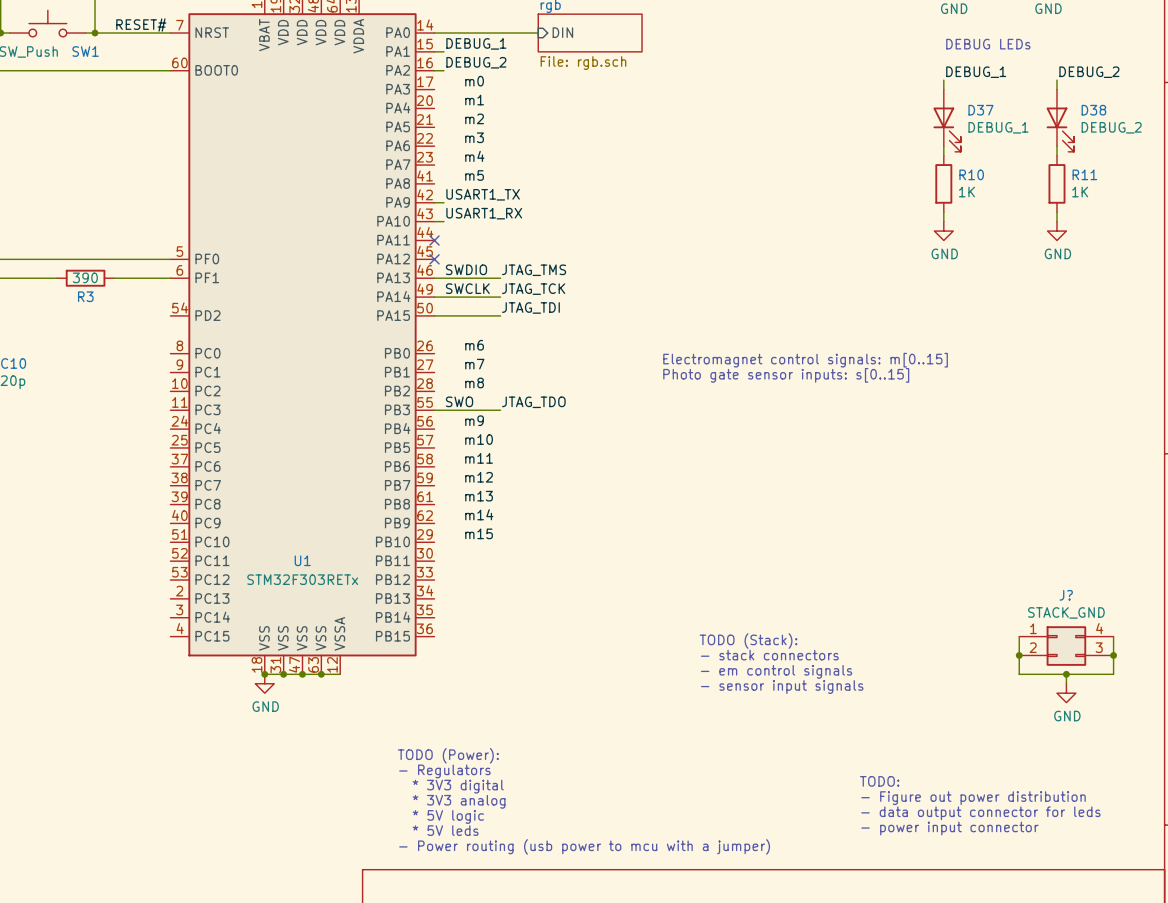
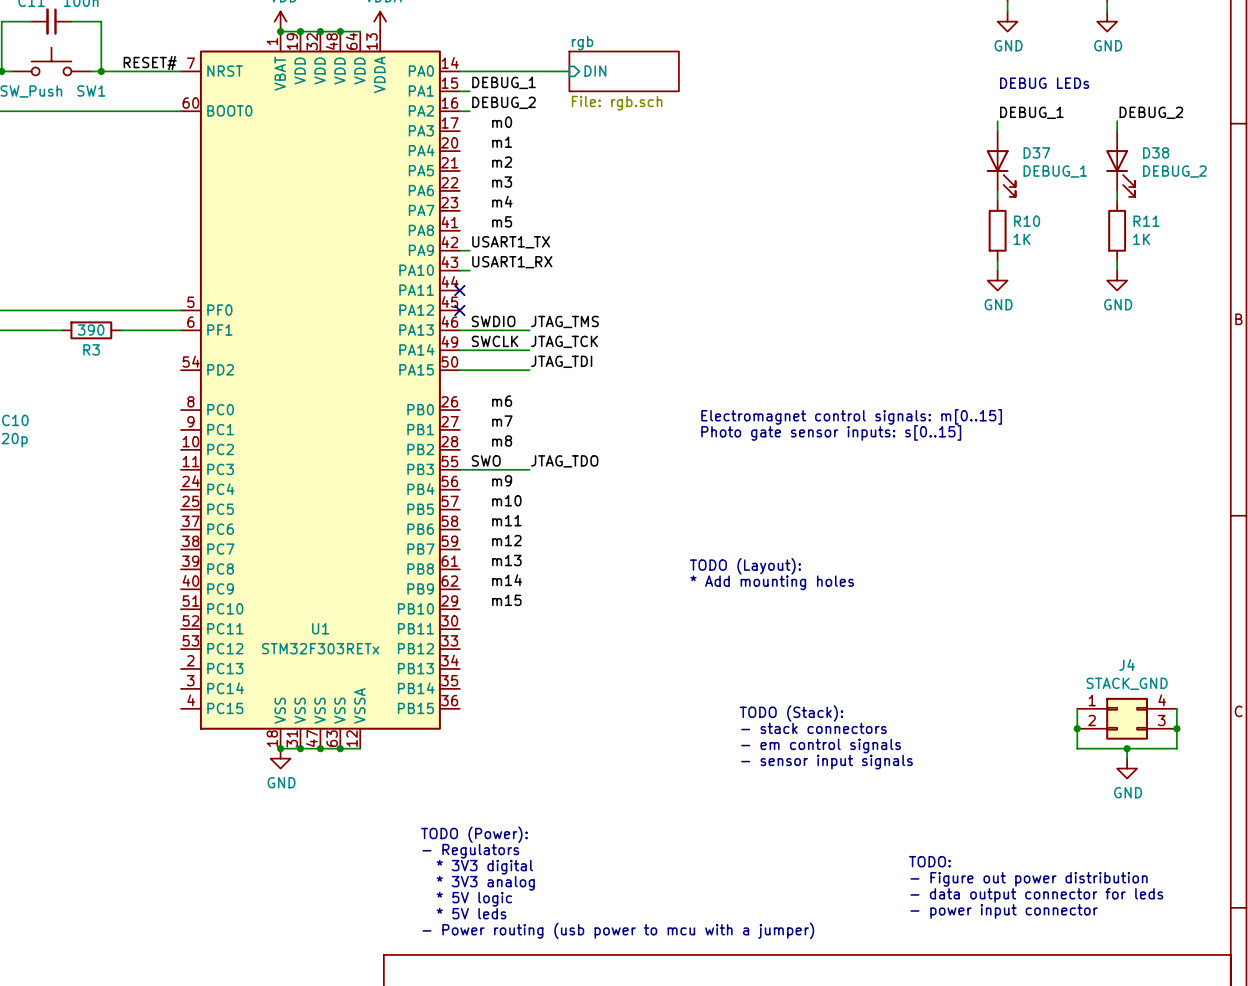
text: none -> TODO (Layout): (745, 566)
text: none -> * Add mounting holes (772, 582)
J? name: J? (1066, 595) -> J4 (1127, 664)

